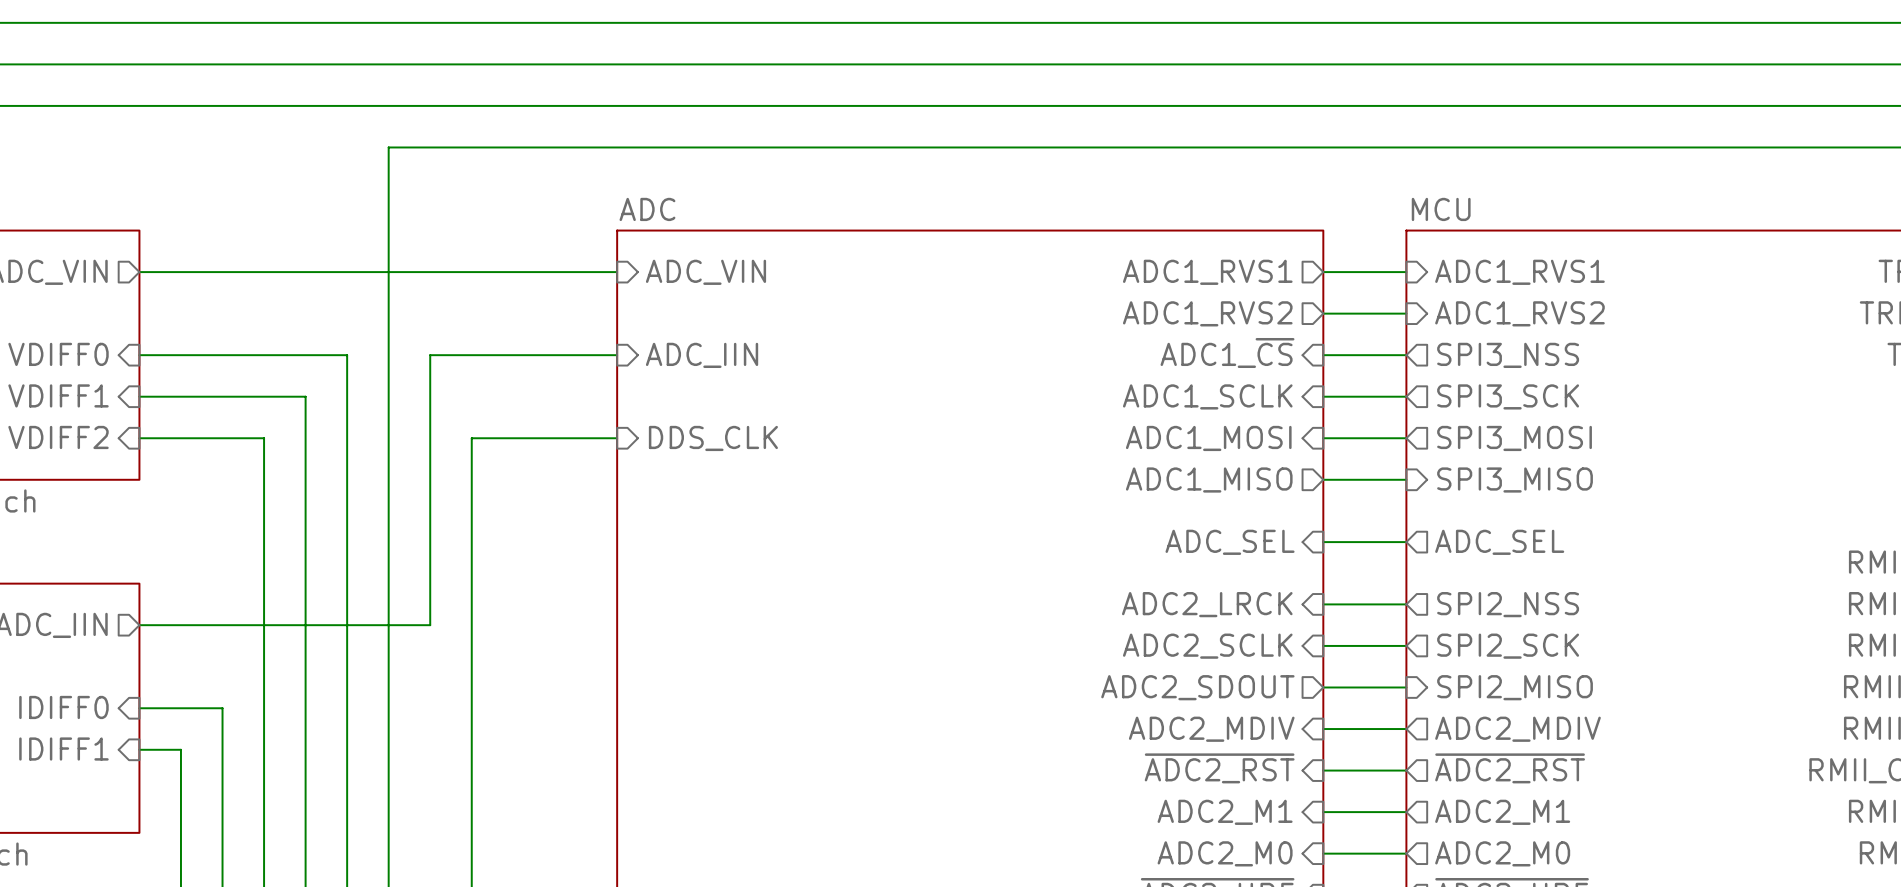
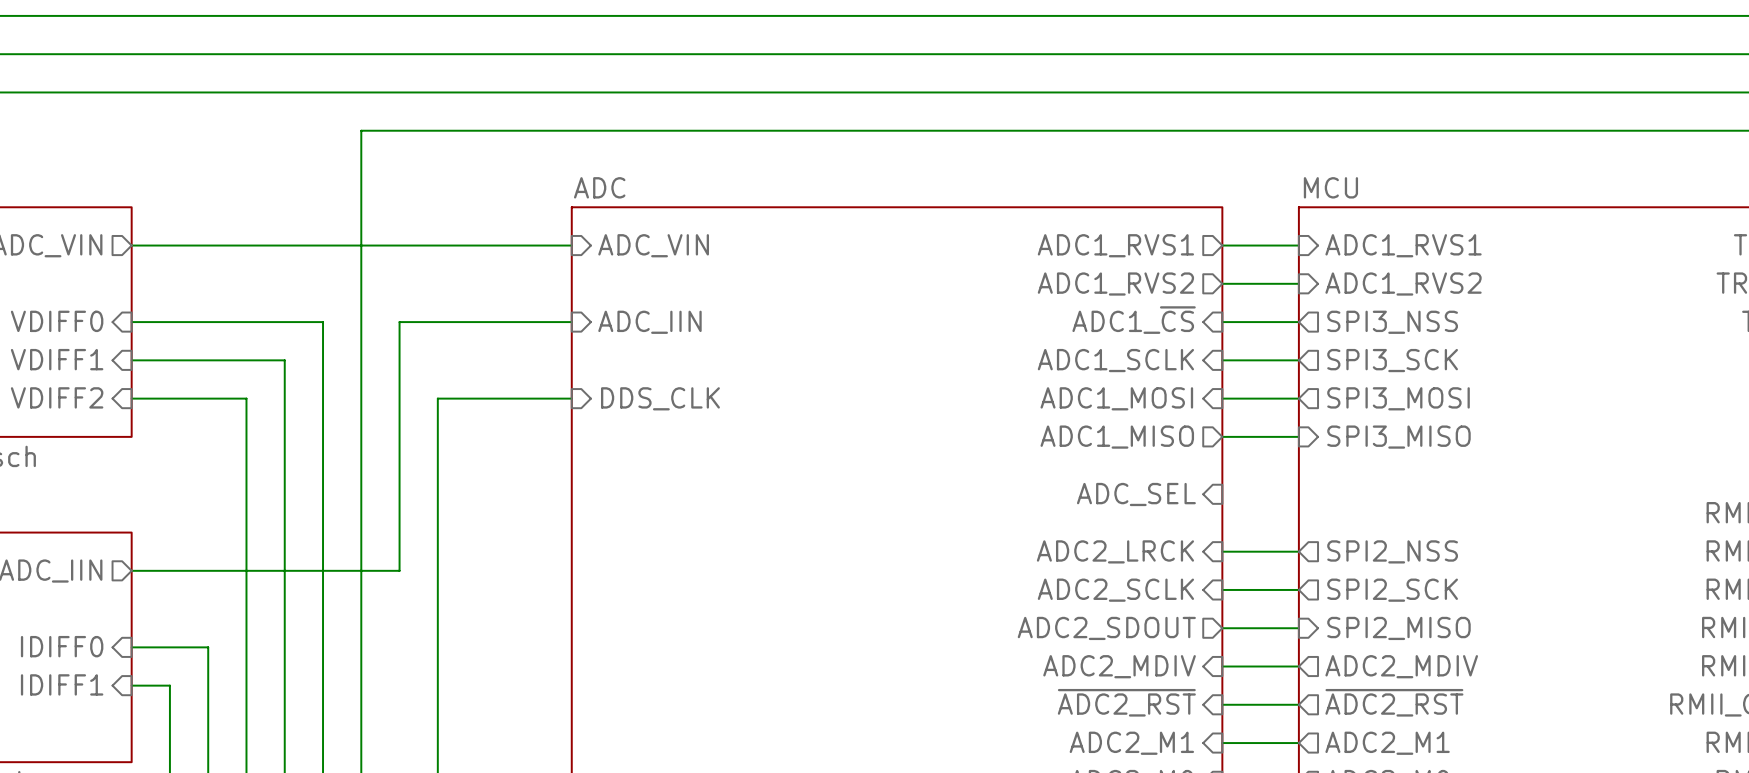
wire: (1323, 542) (1406, 542) -> none
sheet pin: ADC_SEL (1499, 542) -> none

